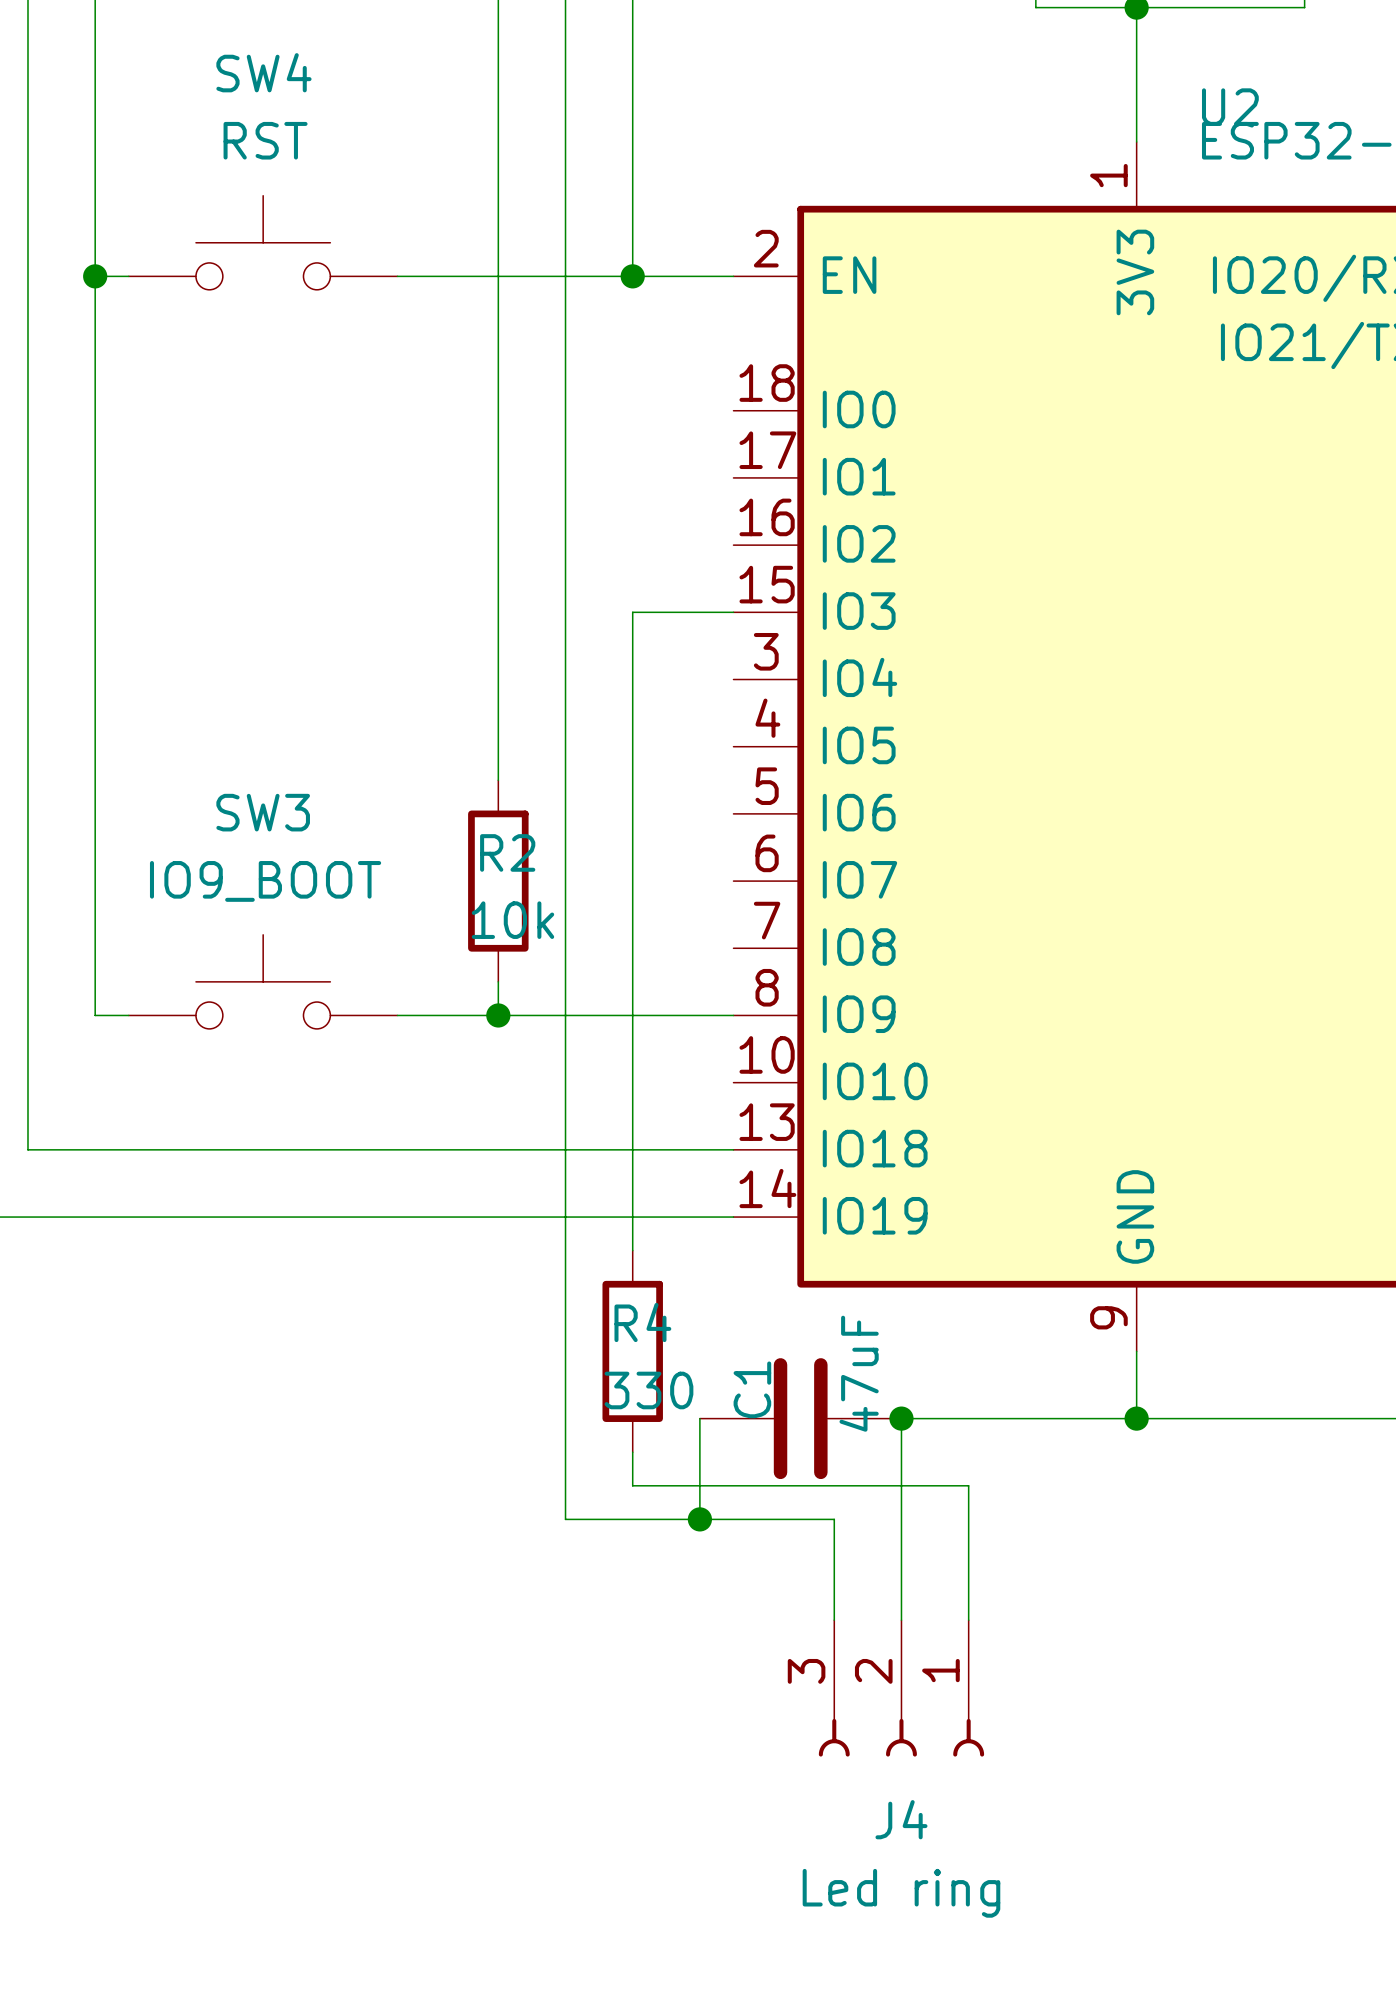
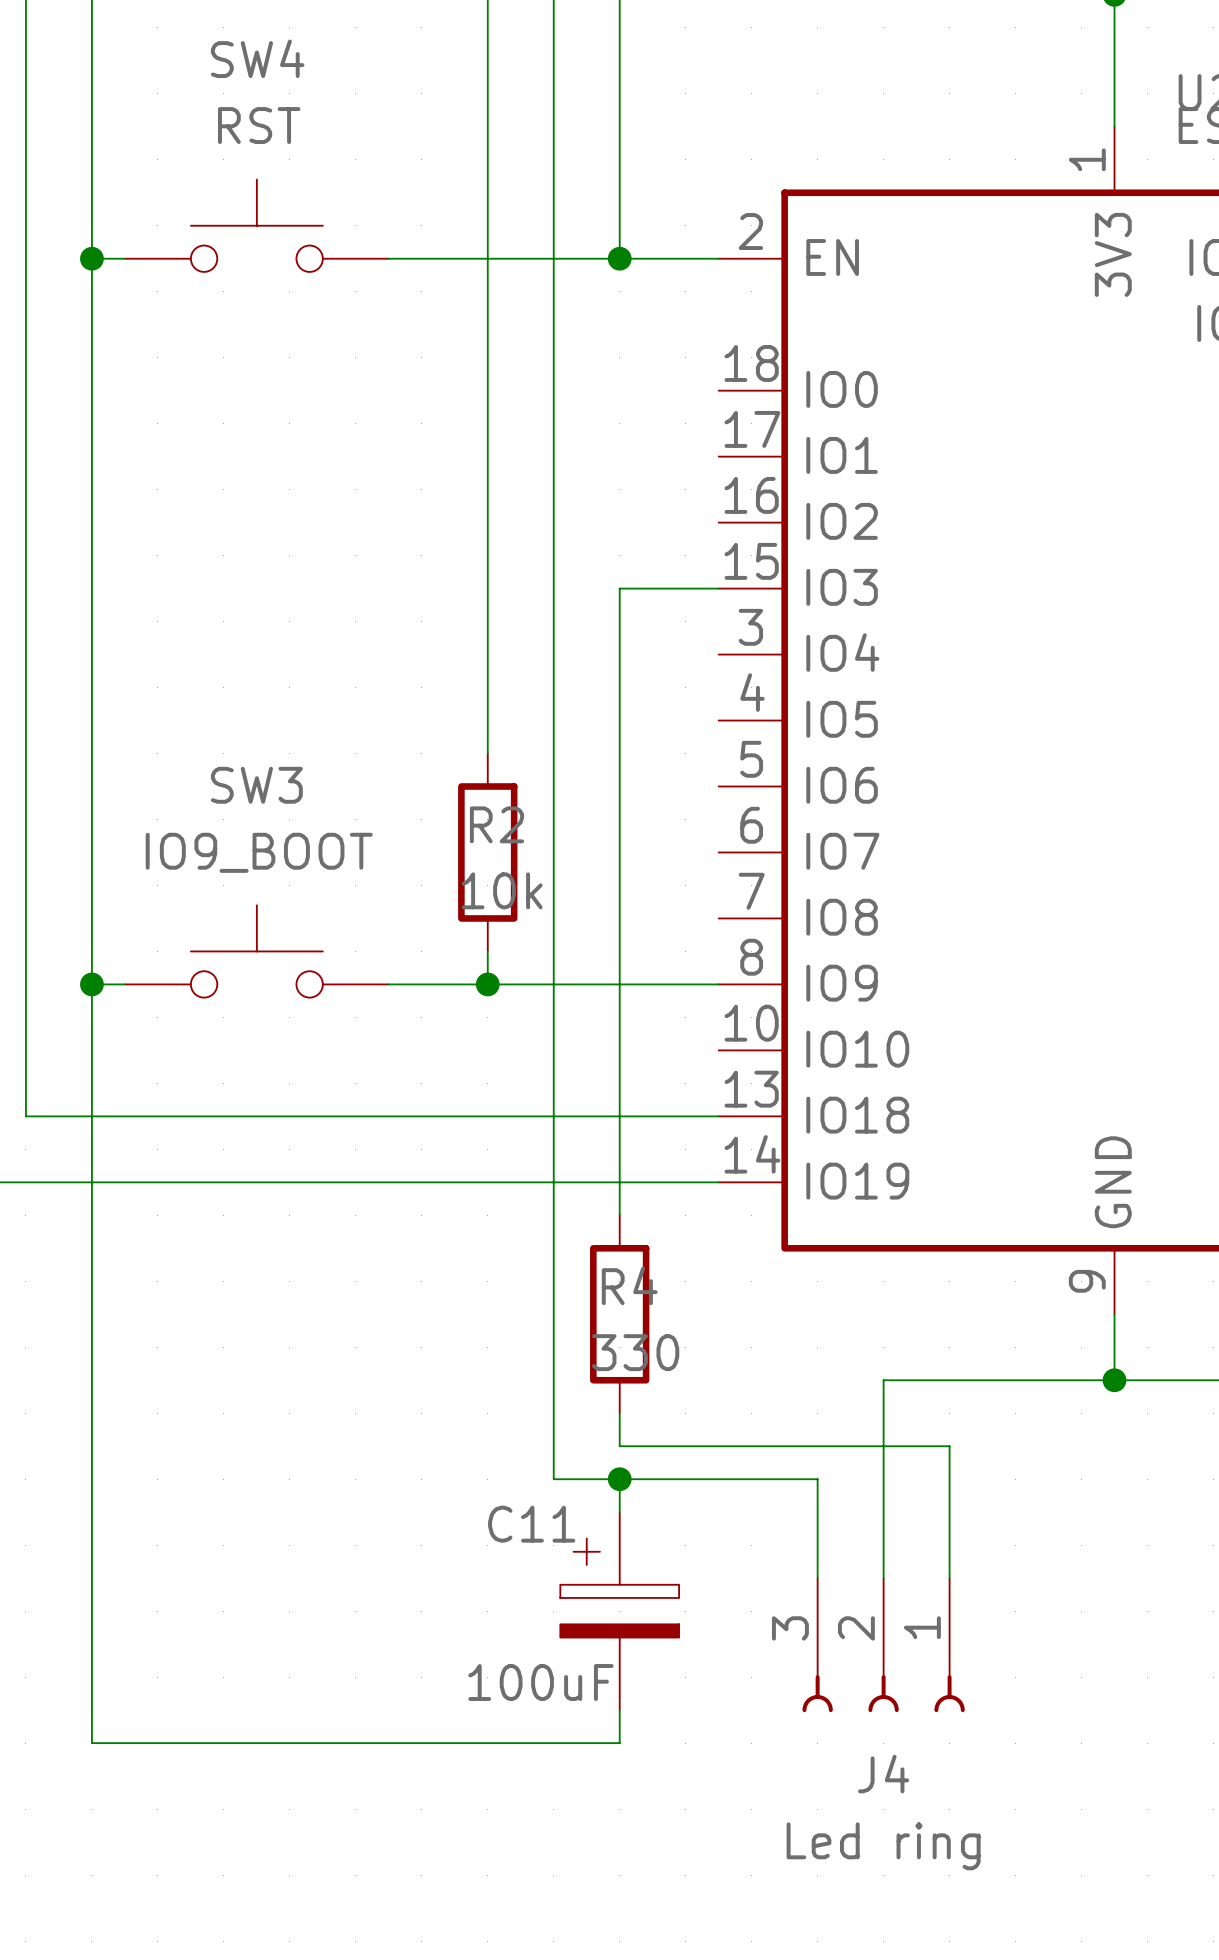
wire: none -> (91, 984) (91, 1743) (619, 1743) (619, 1710)
junction: none -> (91, 984)
wire: (699, 1418) (699, 1519) -> none
C1: 47uF (800, 1418) -> none
junction: (901, 1418) -> none
wire: none -> (619, 1479) (619, 1512)
junction position: (699, 1519) -> (619, 1479)
C11: none -> 100uF (619, 1611)

